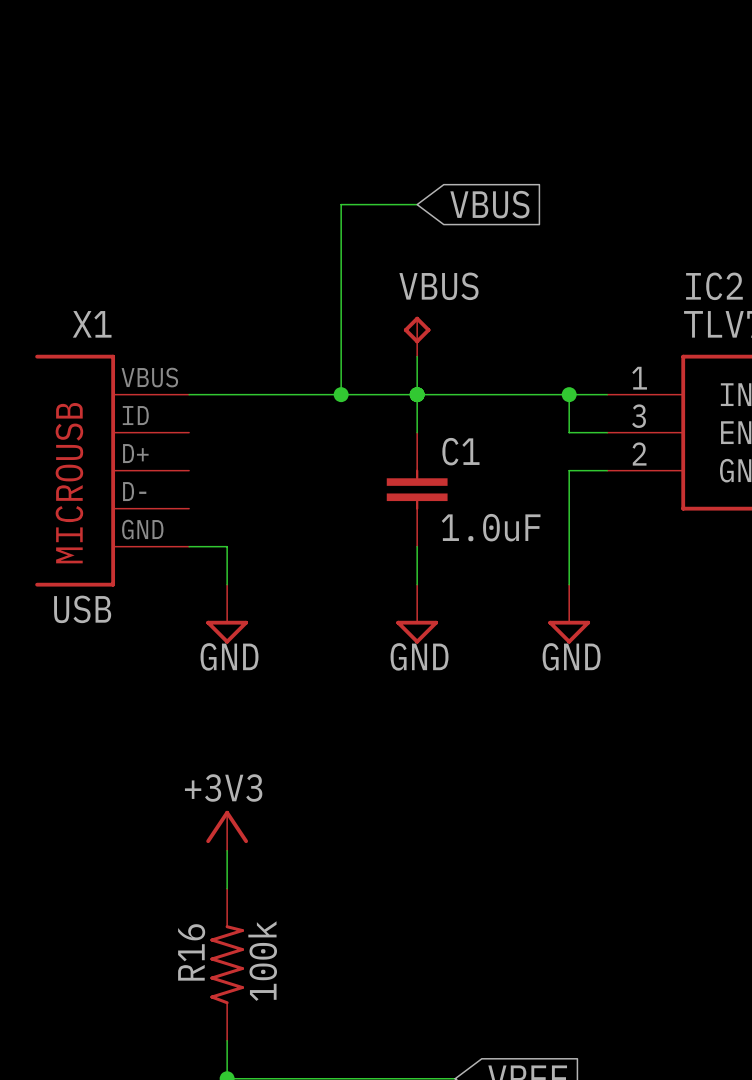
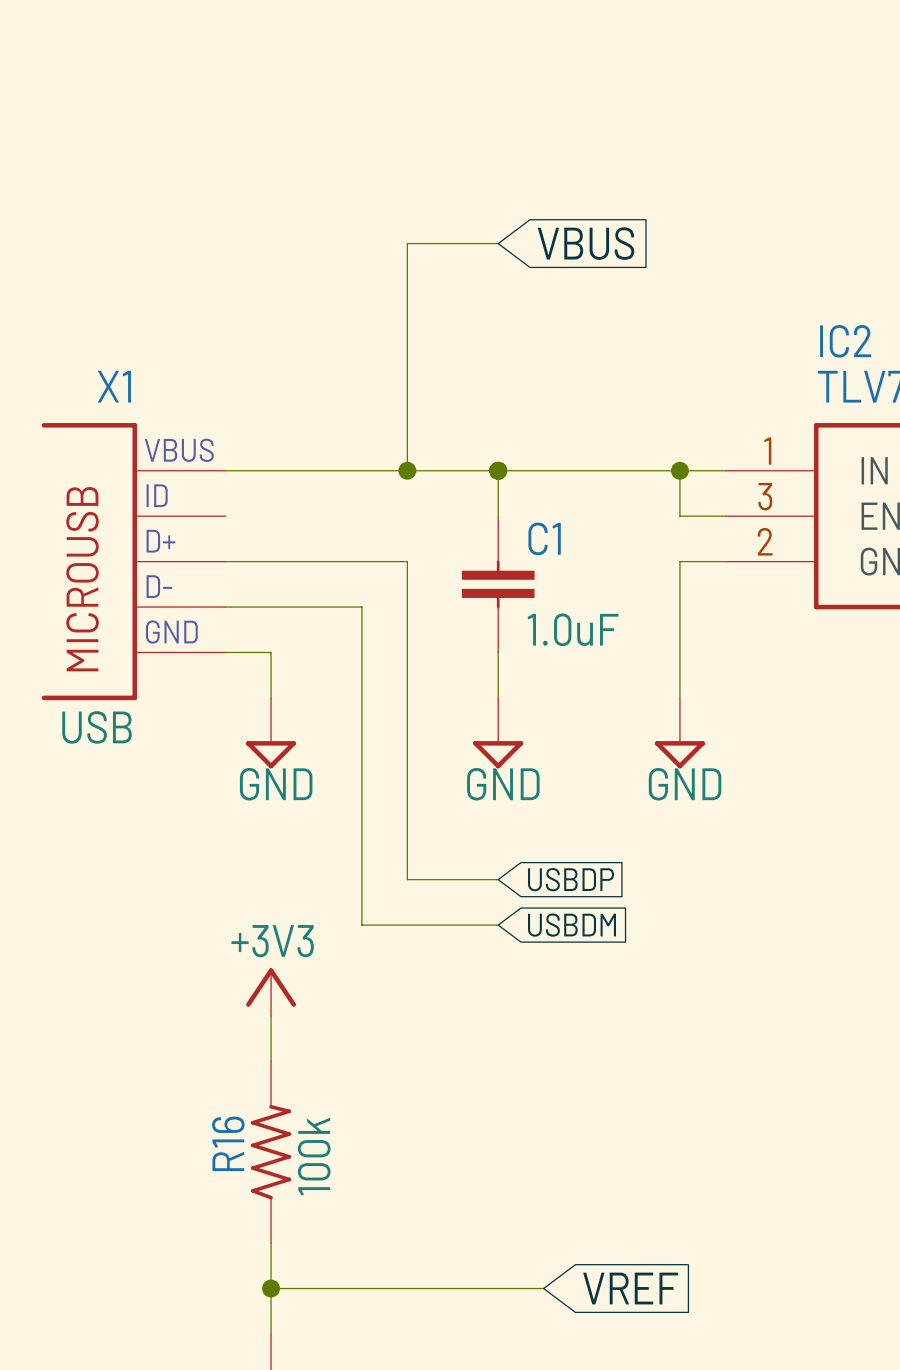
VBUS: (417, 336) -> none
wire: (417, 356) (417, 394) -> none
wire: none -> (225, 561) (407, 561) (407, 879) (498, 879)
wire: none -> (225, 607) (361, 607) (361, 925) (498, 925)
global label: none -> USBDP (571, 879)
global label: none -> USBDM (571, 925)

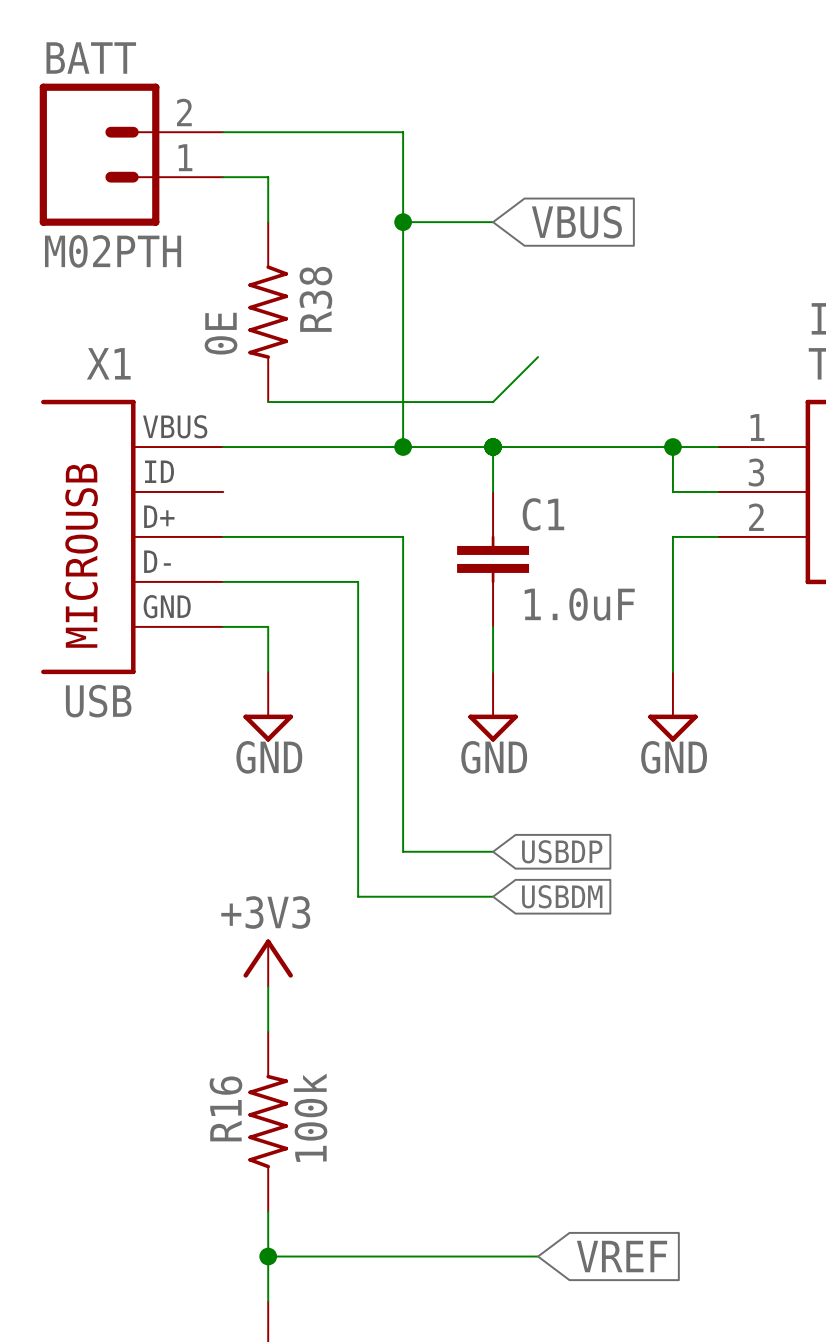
wire: none -> (223, 132) (403, 132) (403, 222)
BATT: none -> M02PTH (131, 154)
wire: none -> (223, 177) (268, 177) (268, 222)
junction: none -> (403, 222)
R38: none -> 0E (268, 312)
wire: none -> (538, 357) (493, 402) (268, 402)

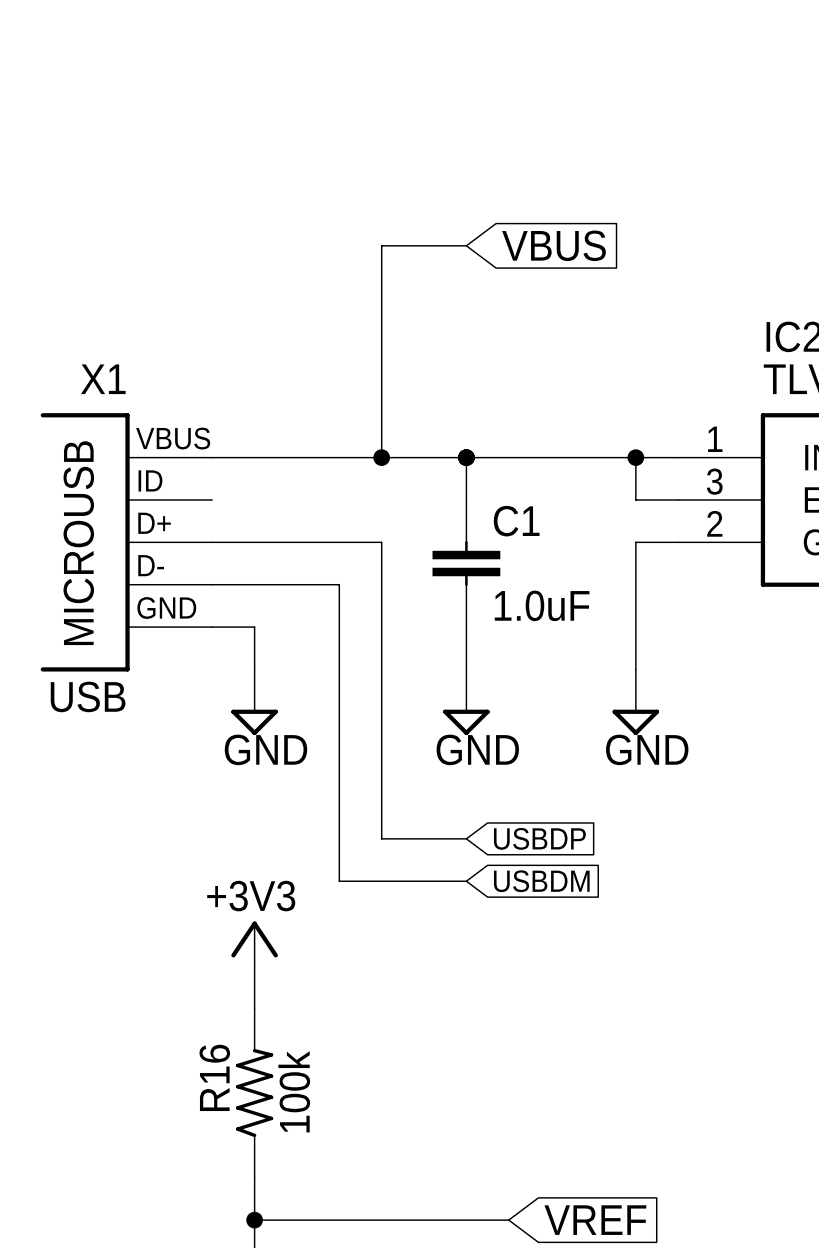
wire: (223, 132) (403, 132) (403, 222) -> none
BATT: M02PTH (131, 154) -> none
wire: (223, 177) (268, 177) (268, 222) -> none
junction: (403, 222) -> none
R38: 0E (268, 312) -> none
wire: (538, 357) (493, 402) (268, 402) -> none

